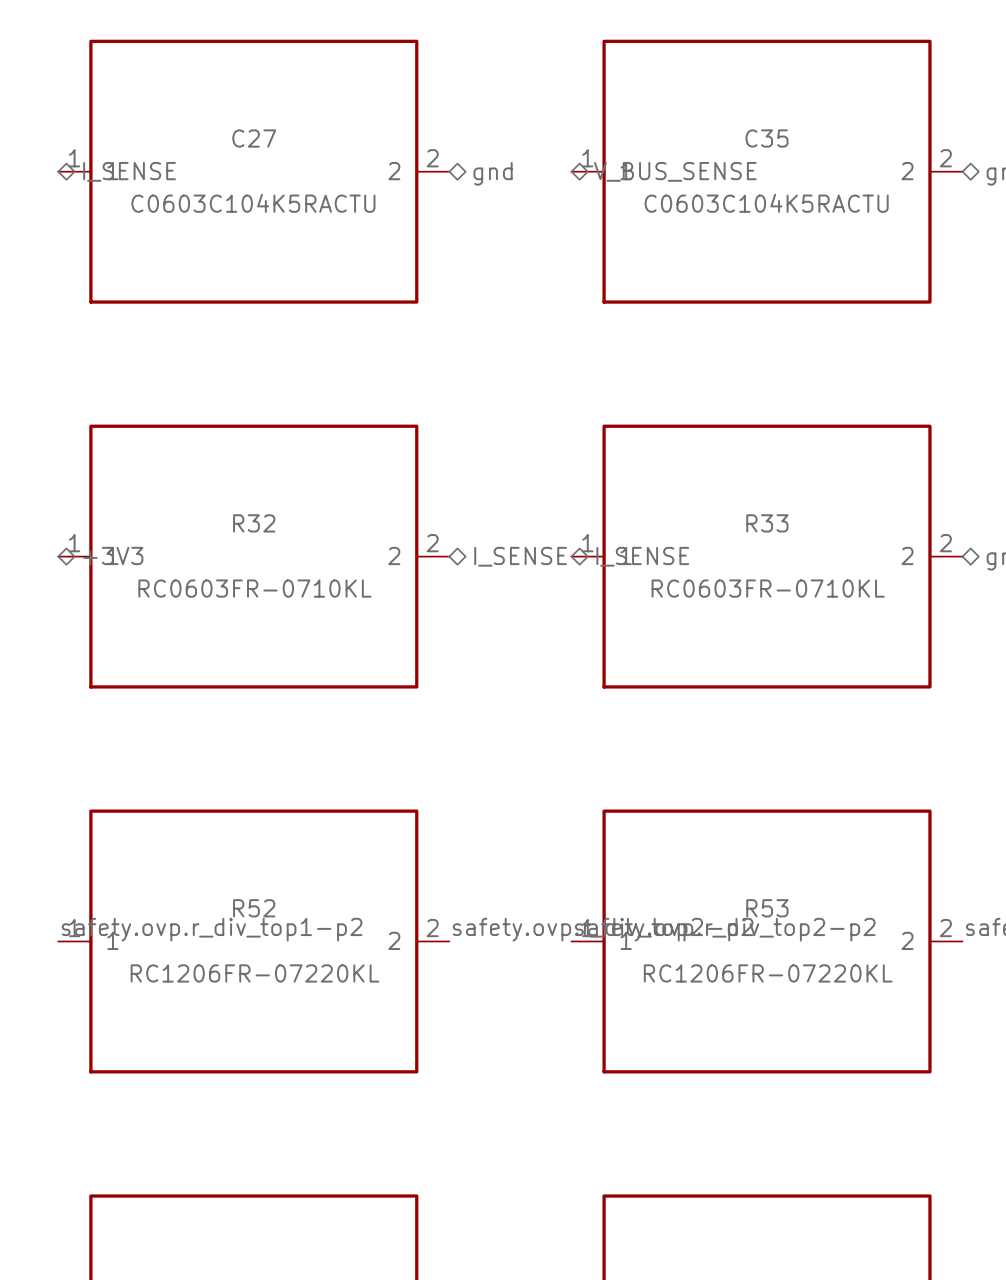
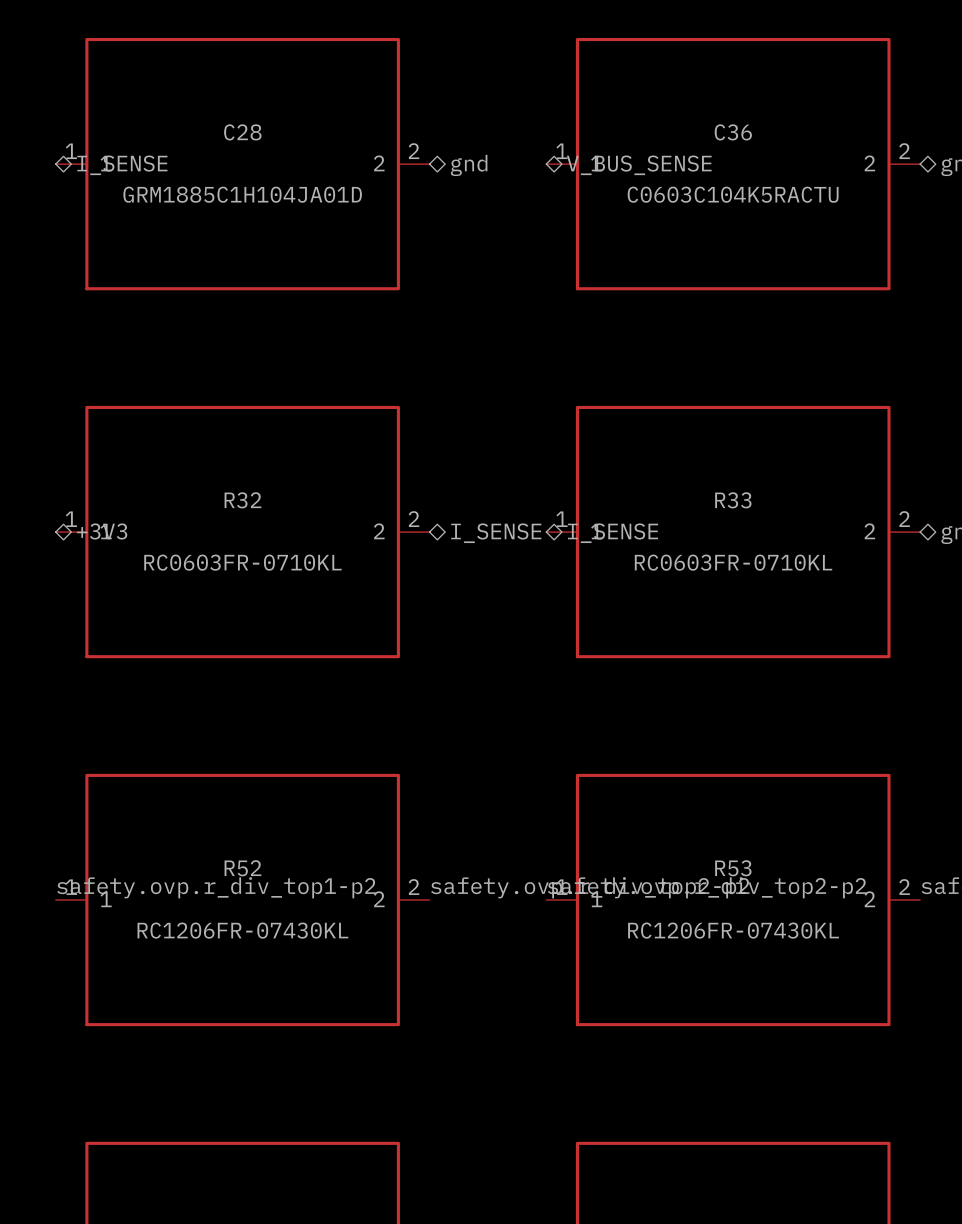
C27 name: C27 (254, 138) -> C28 (242, 132)
C35 name: C35 (767, 138) -> C36 (733, 132)
C27 value: C0603C104K5RACTU (253, 203) -> GRM1885C1H104JA01D (242, 194)
R52 value: RC1206FR-07220KL (255, 973) -> RC1206FR-07430KL (242, 930)
R53 value: RC1206FR-07220KL (768, 973) -> RC1206FR-07430KL (733, 930)

